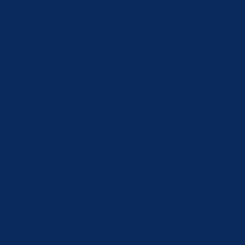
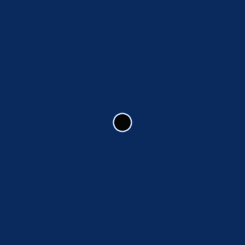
part: none -> (122, 122)

